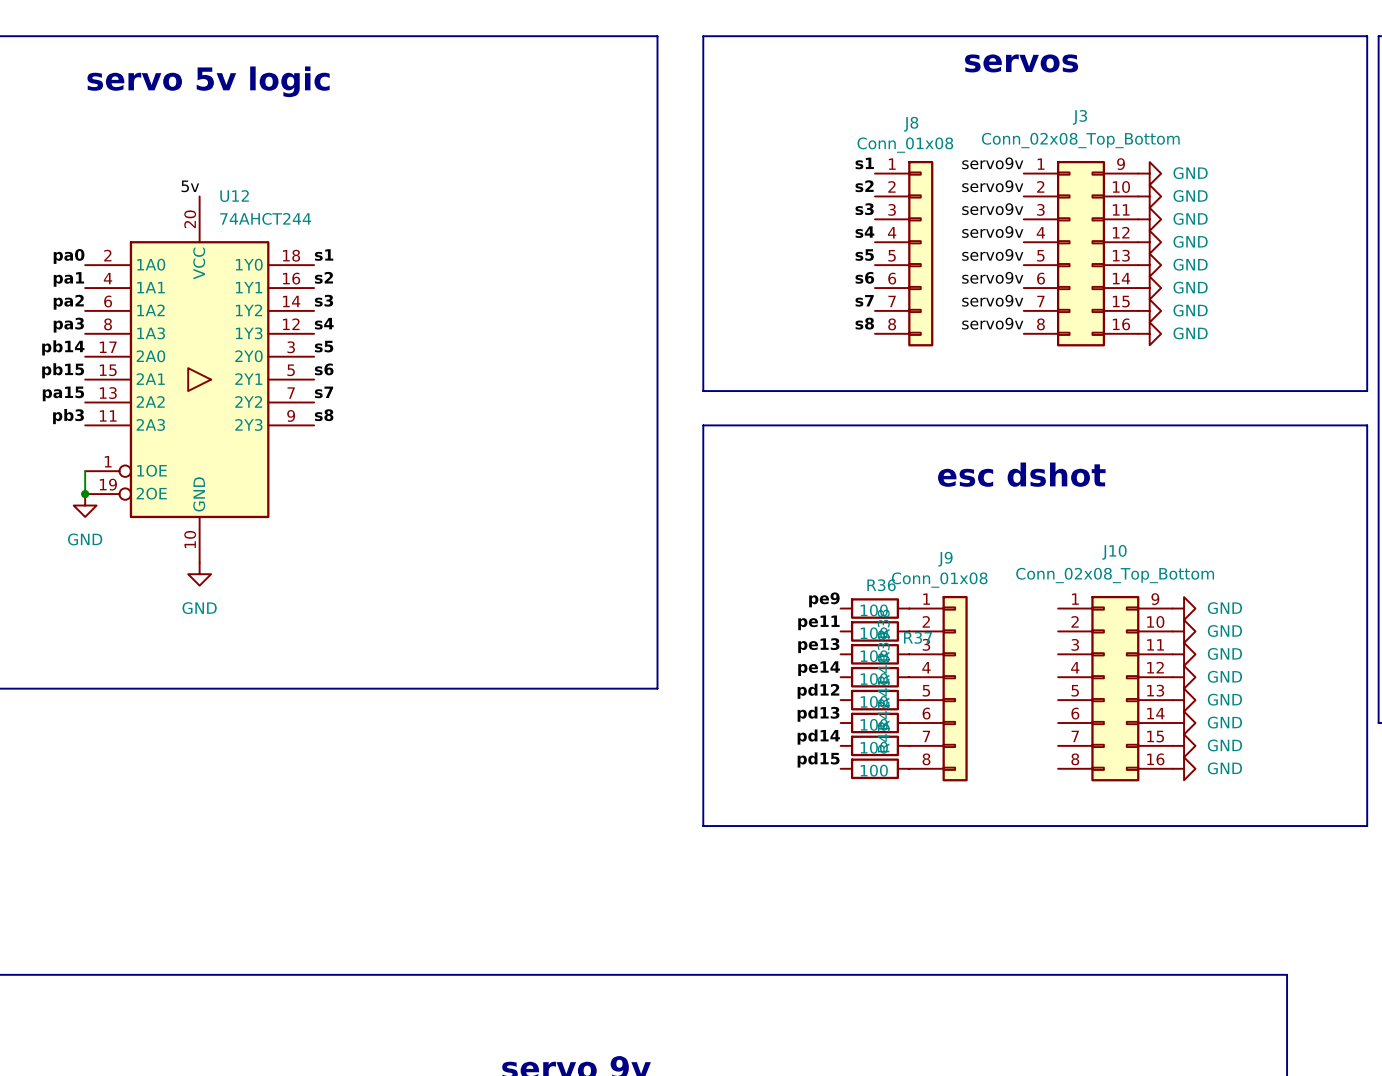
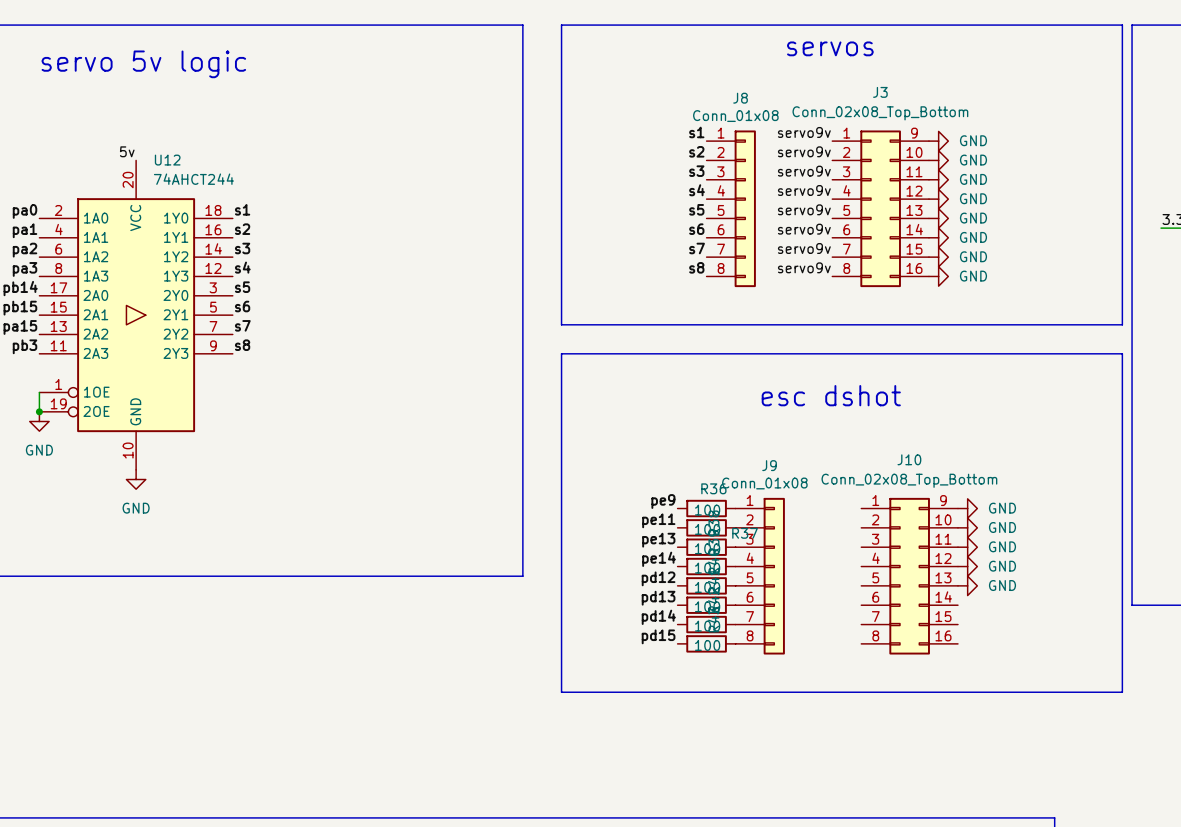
power symbol: GND (1184, 723) -> none
power symbol: GND (1184, 745) -> none
power symbol: GND (1184, 768) -> none

